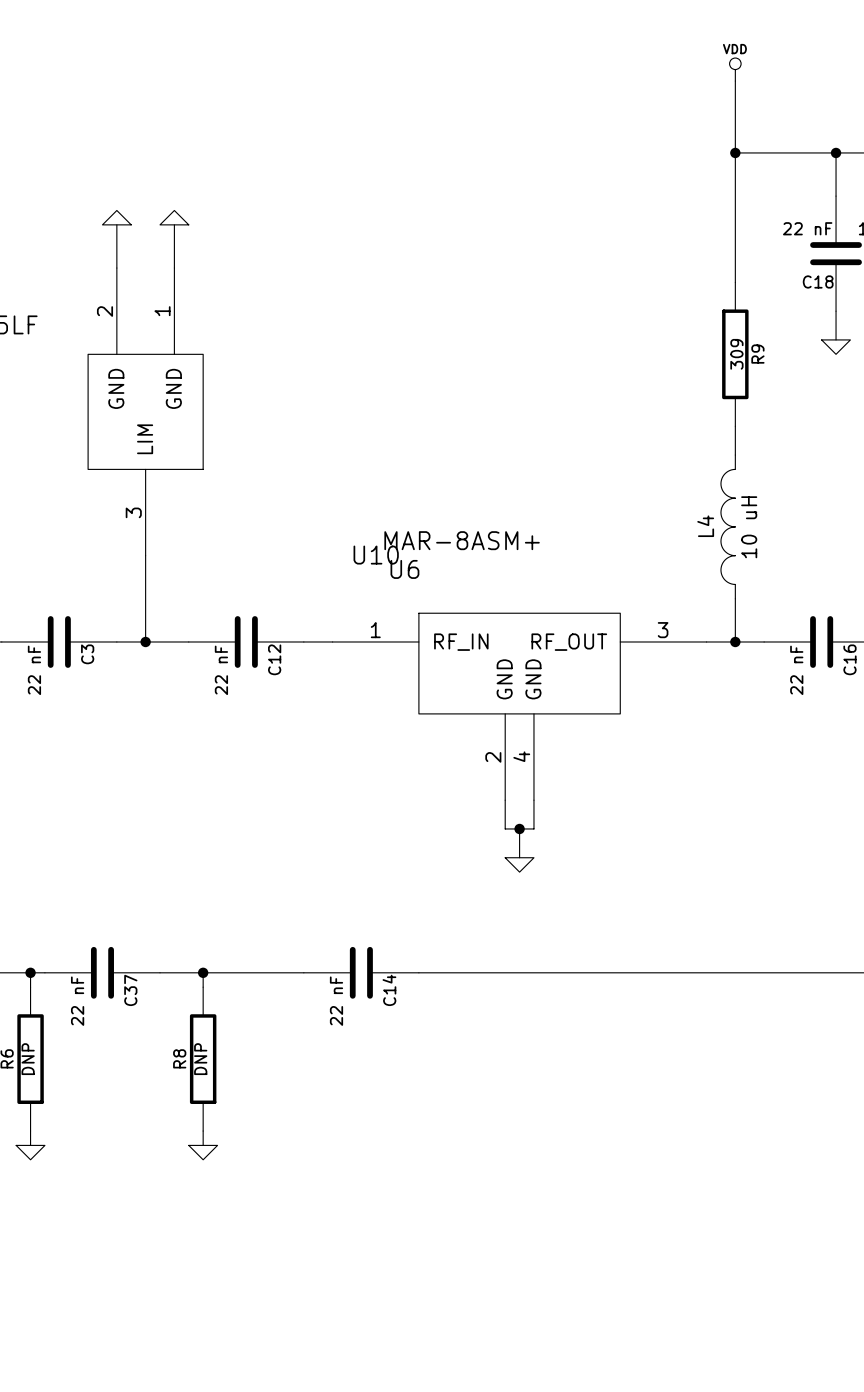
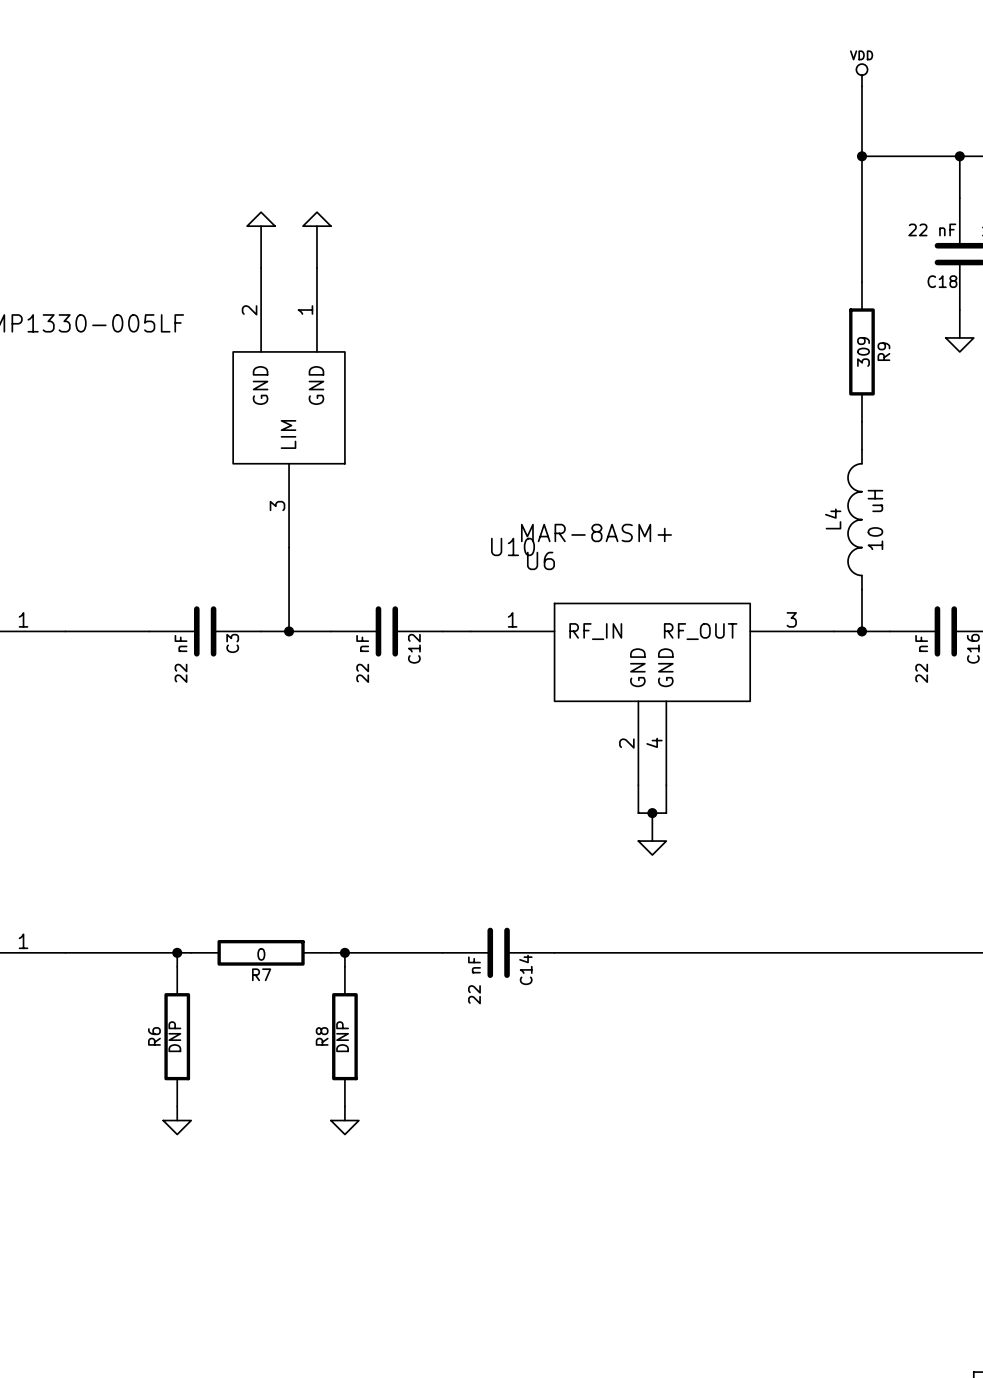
C37: 22 nF (102, 972) -> none
R7: none -> 0 (261, 952)

